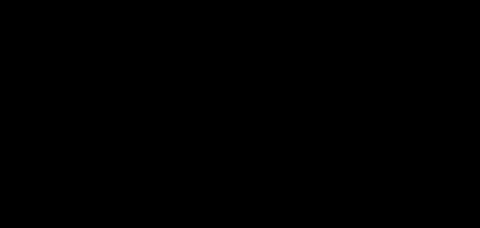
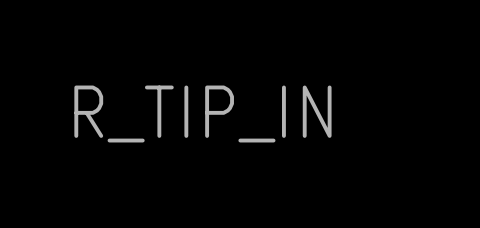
label: none -> R_TIP_IN (202, 114)

